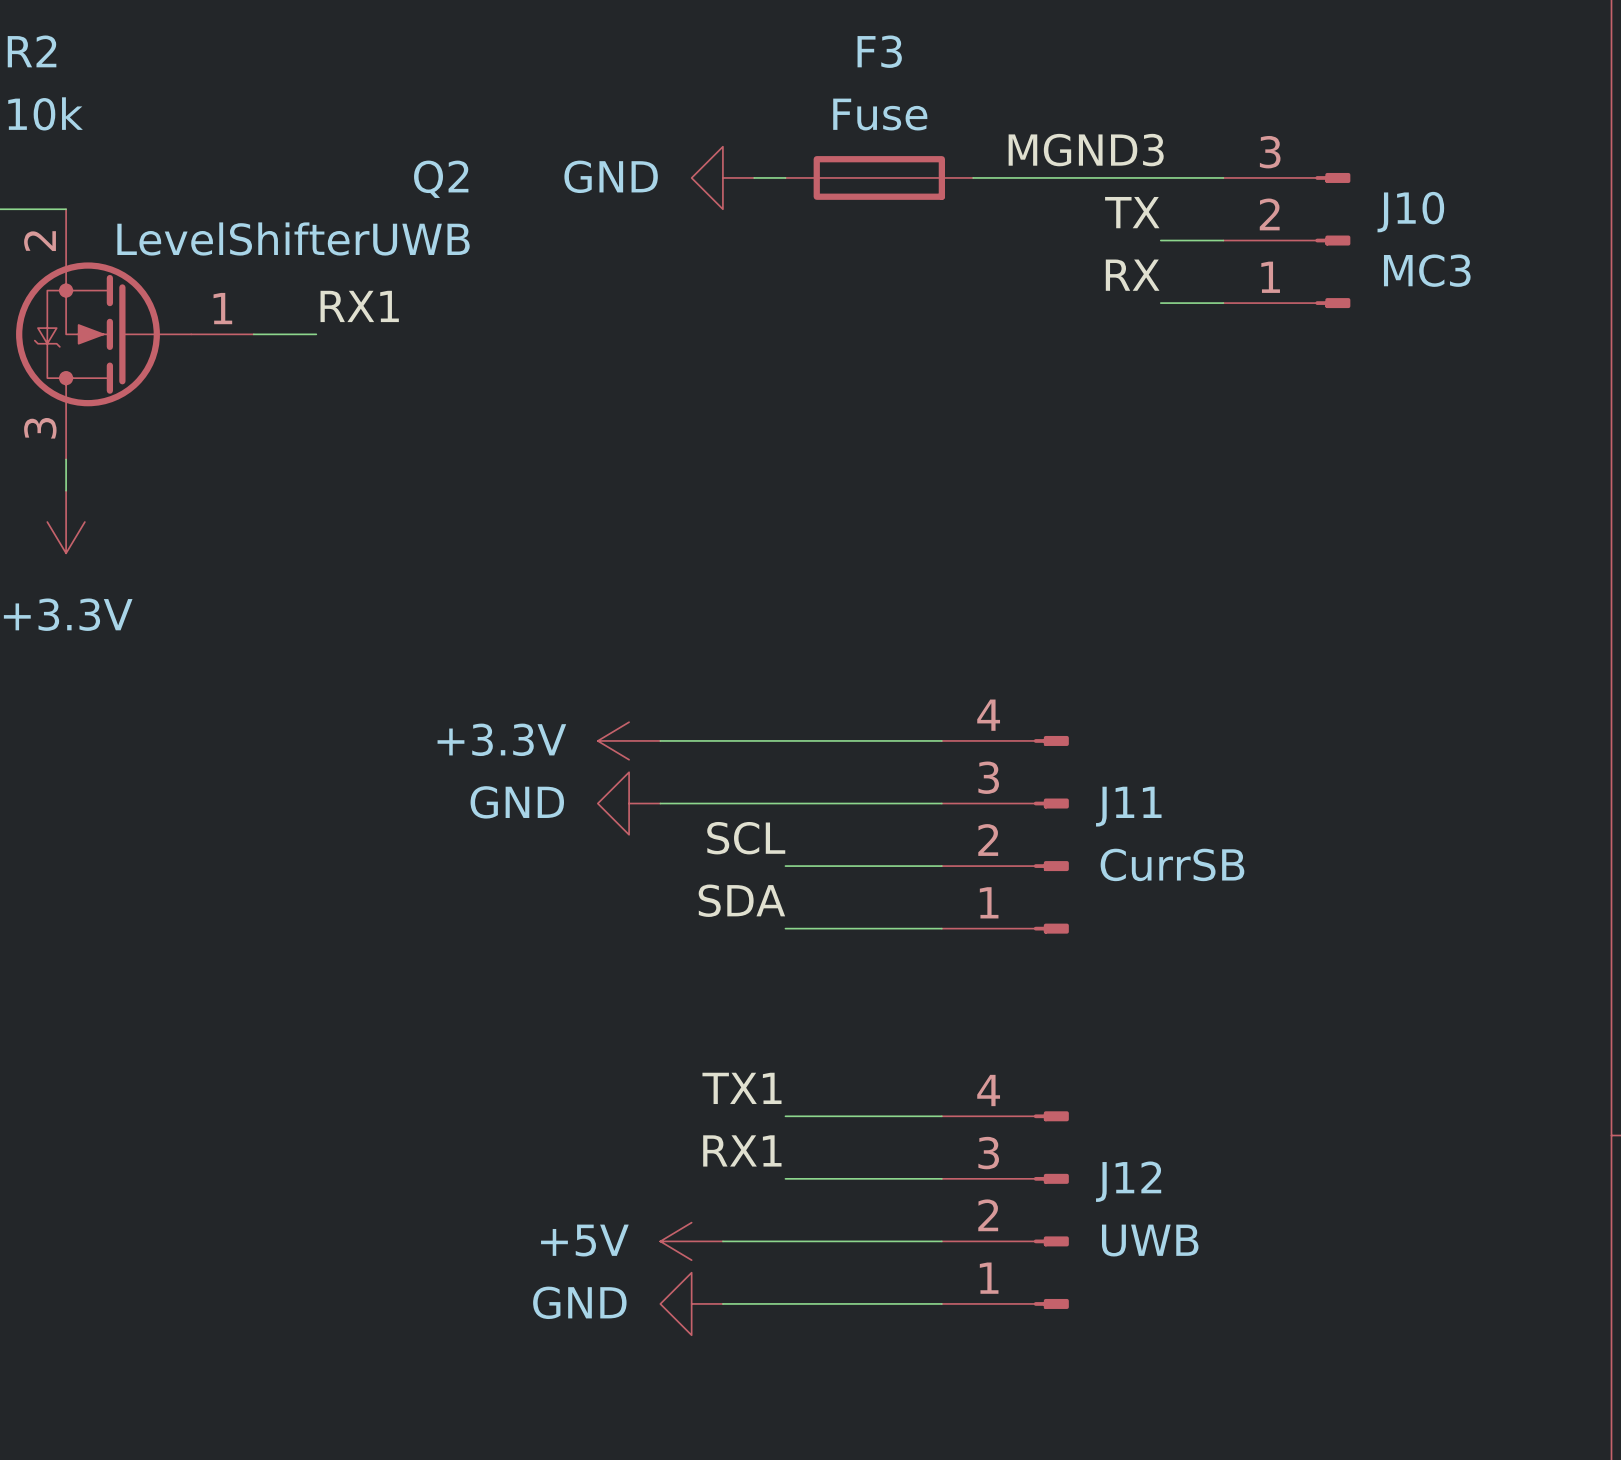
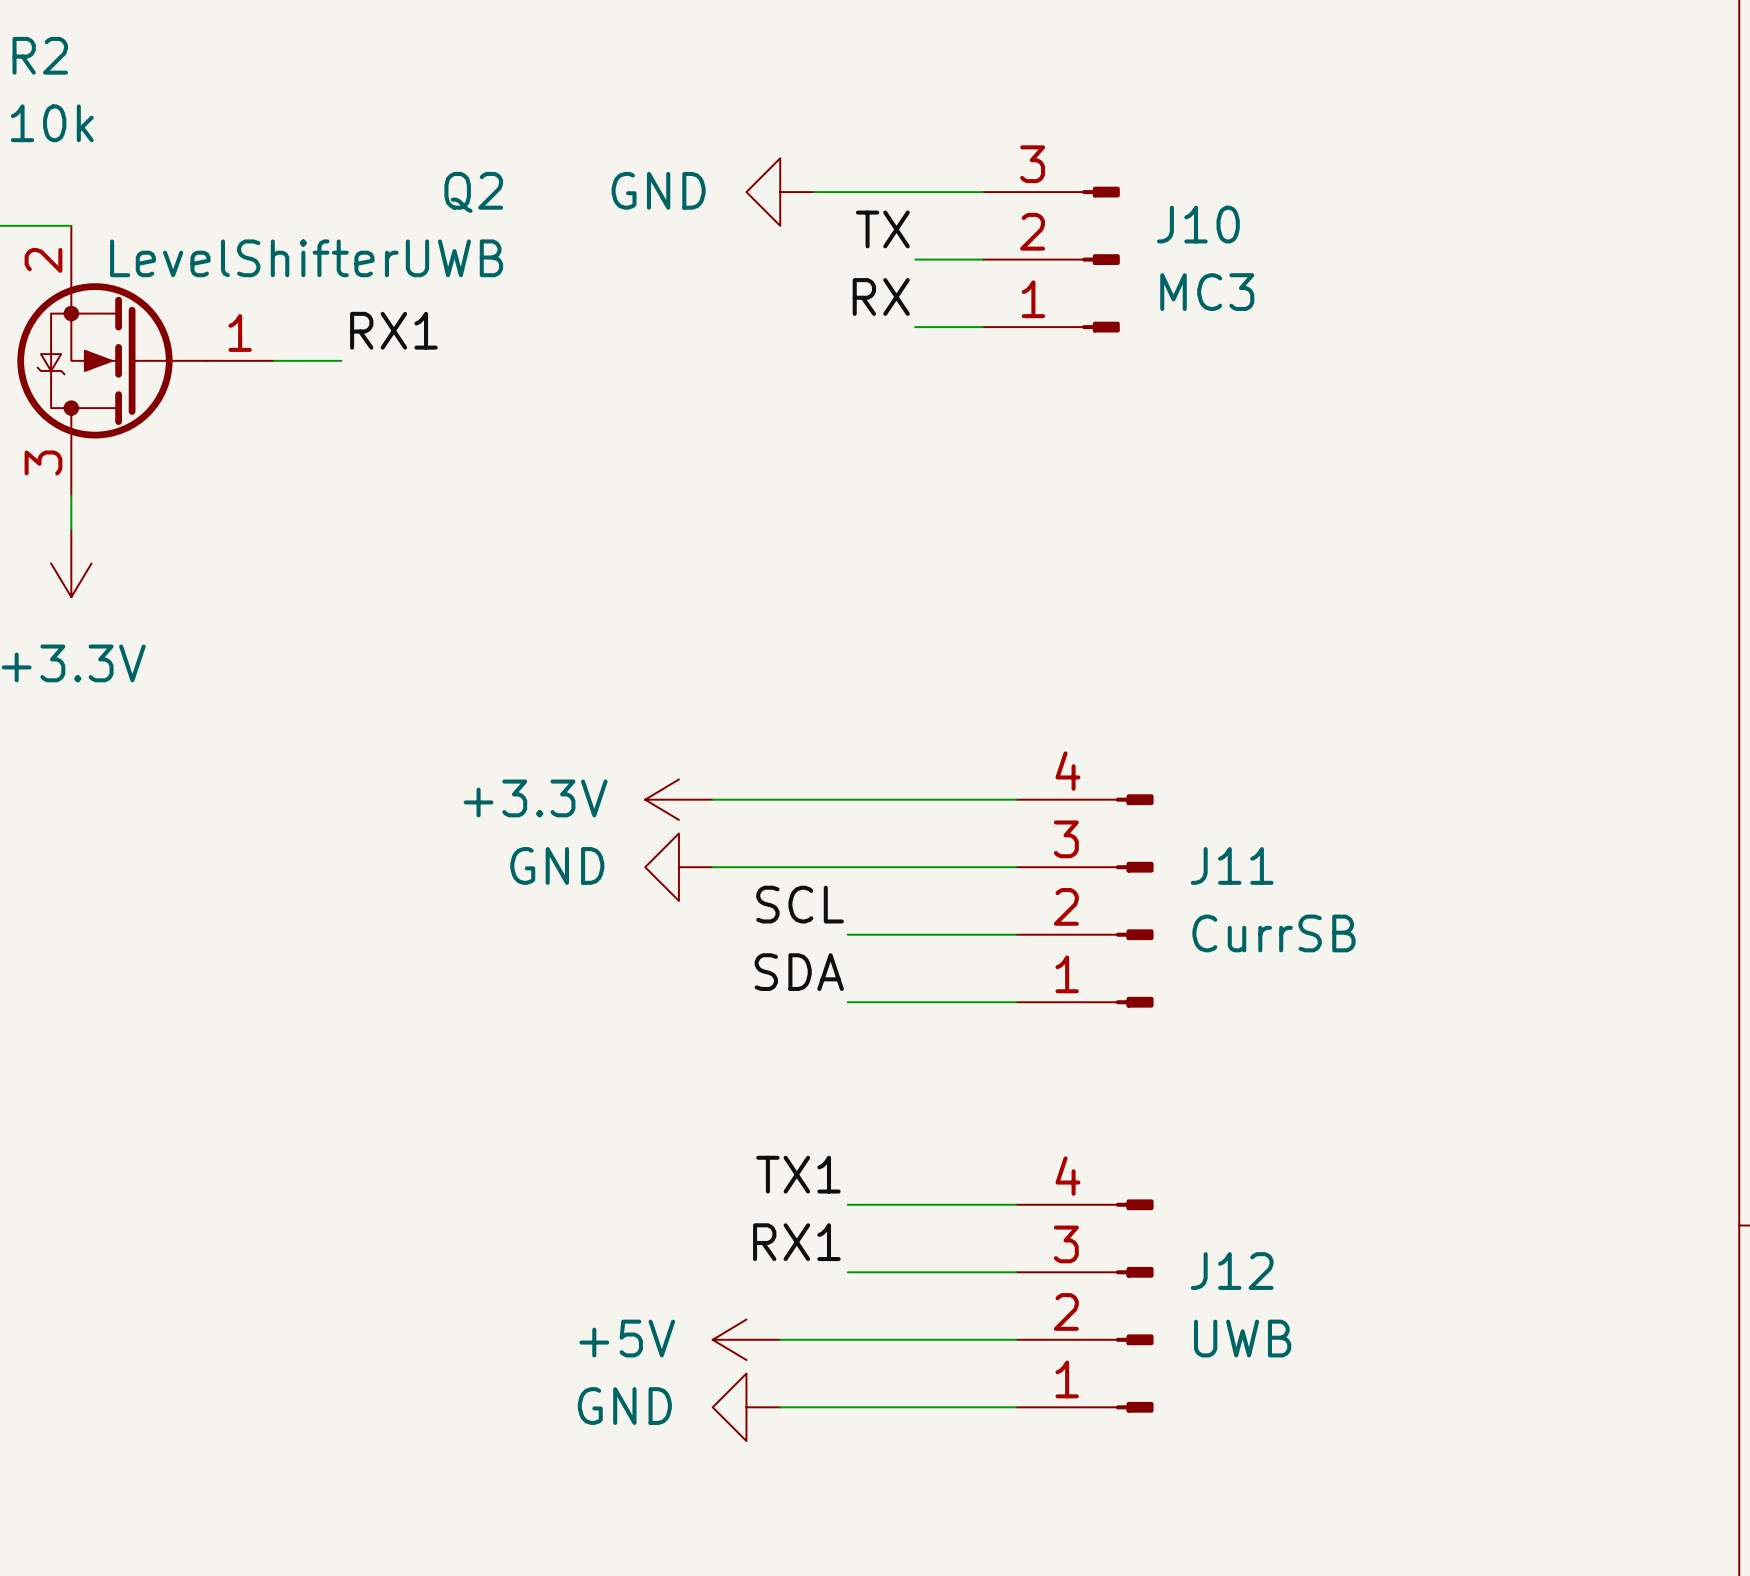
label: MGND3 (1086, 150) -> none
F3: Fuse (879, 177) -> none
wire: (973, 177) (1223, 177) -> none
label position: TX (1132, 212) -> TX (882, 229)
wire: (1160, 240) (1223, 240) -> (915, 259) (982, 259)
J10 position: (1286, 240) -> (1051, 259)
label: none -> RX (881, 296)
label: RX (1132, 275) -> none
wire: (1160, 303) (1223, 303) -> (915, 327) (982, 327)

